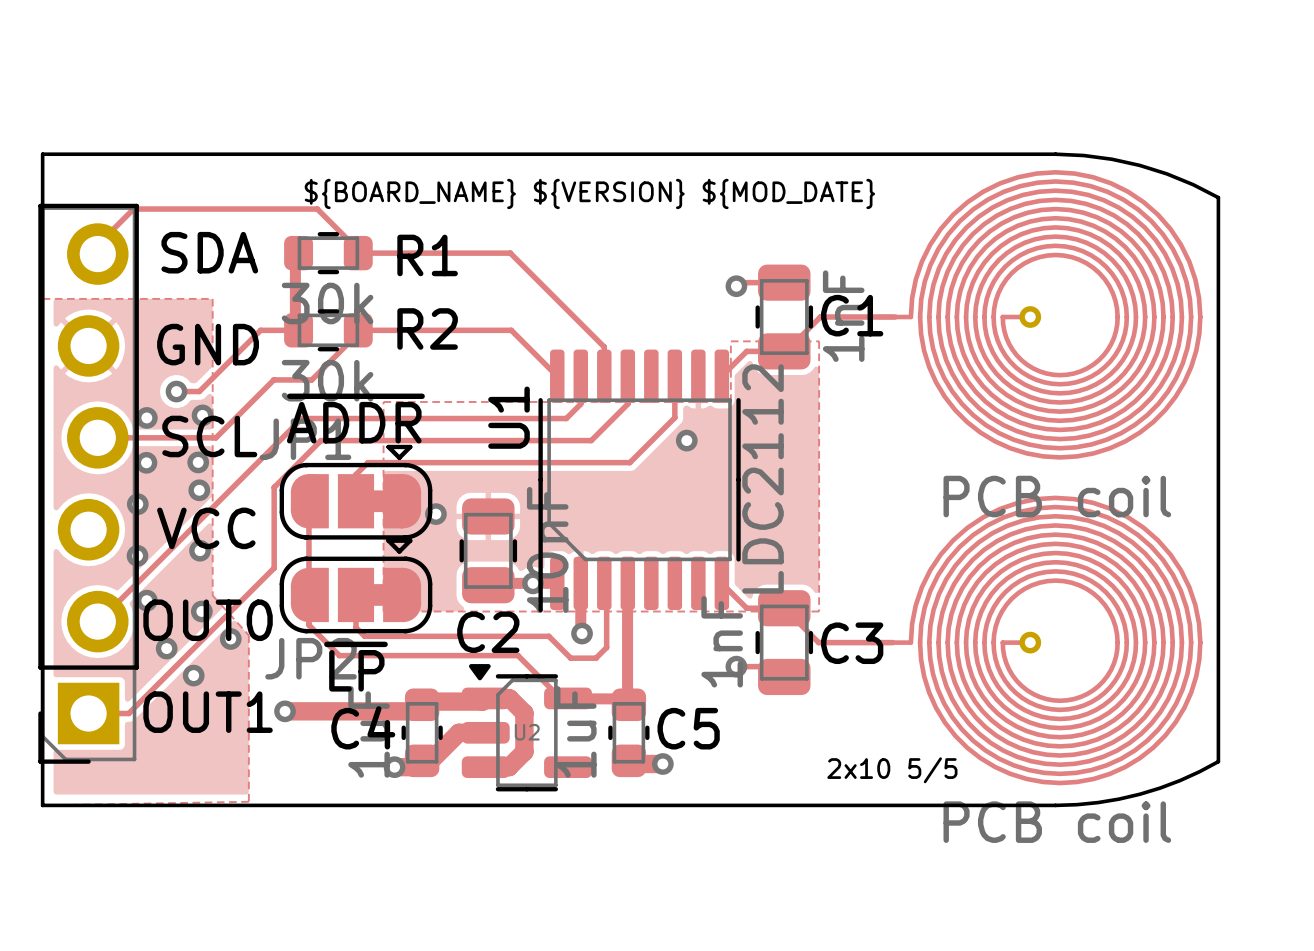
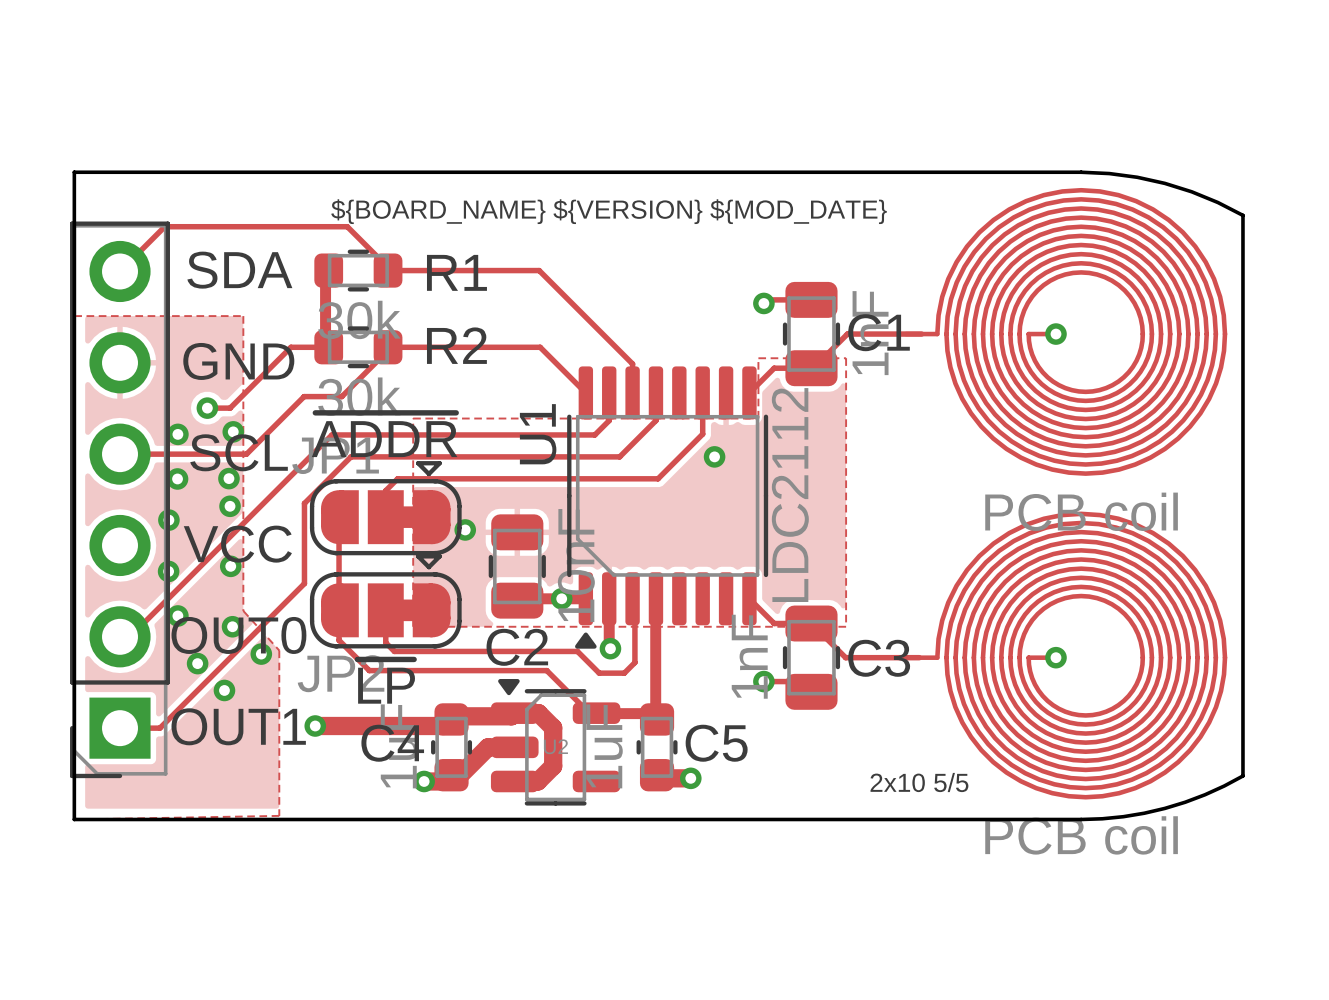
part footprint: [38, 203, 139, 764] -> [70, 221, 170, 779]
U1 footprint: [538, 349, 741, 613] -> [567, 366, 769, 649]

